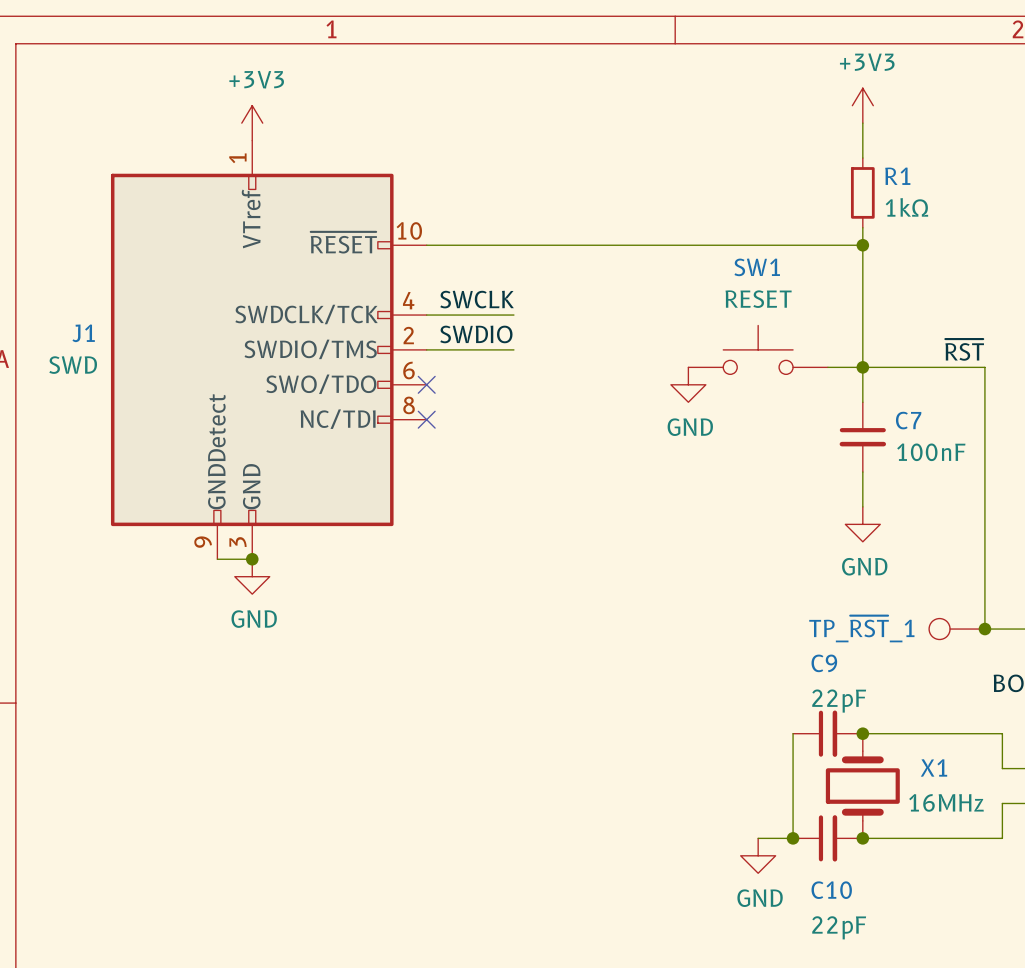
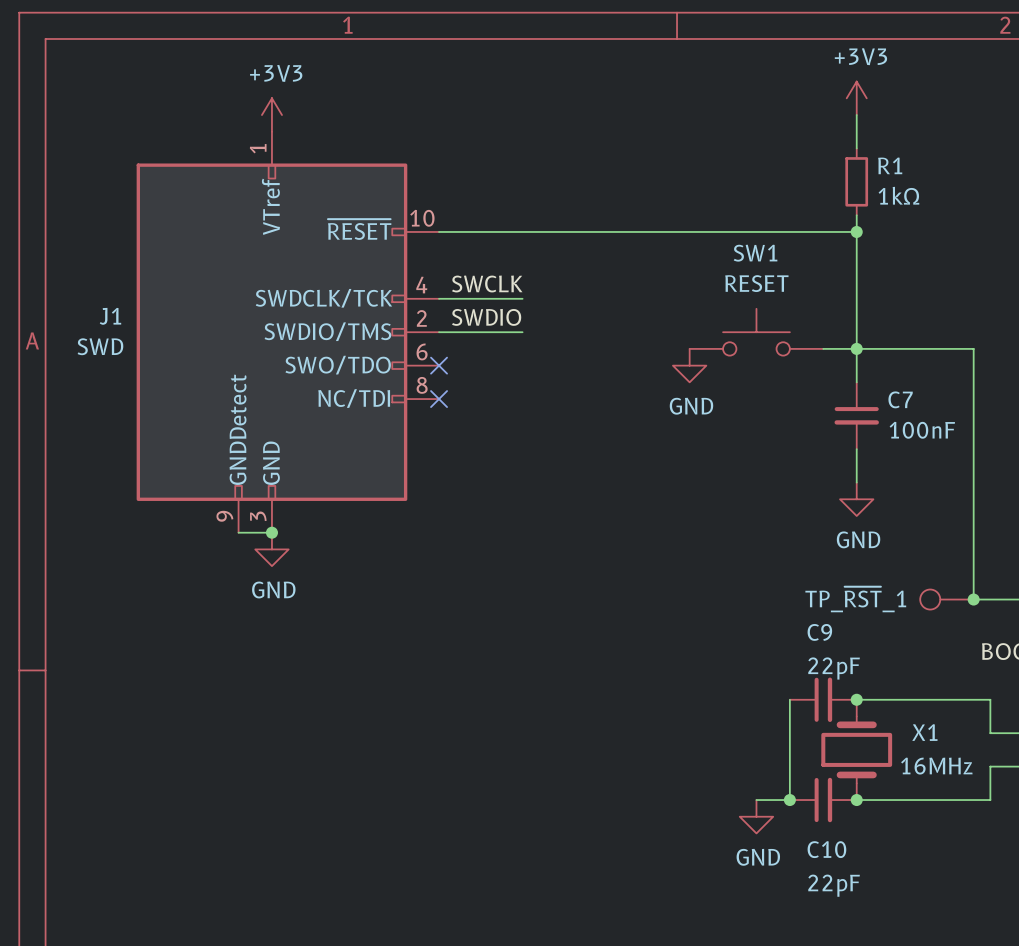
label: ~{RST} (964, 349) -> none

